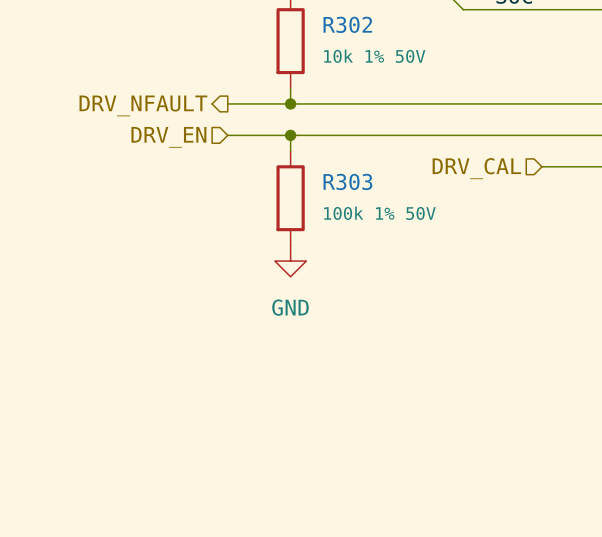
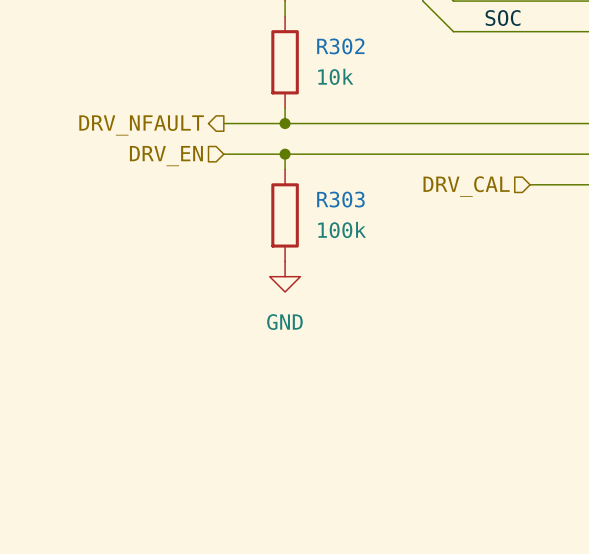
R302 value: 10k 1% 50V (374, 56) -> 10k (335, 76)
R303 value: 100k 1% 50V (379, 213) -> 100k (342, 229)

